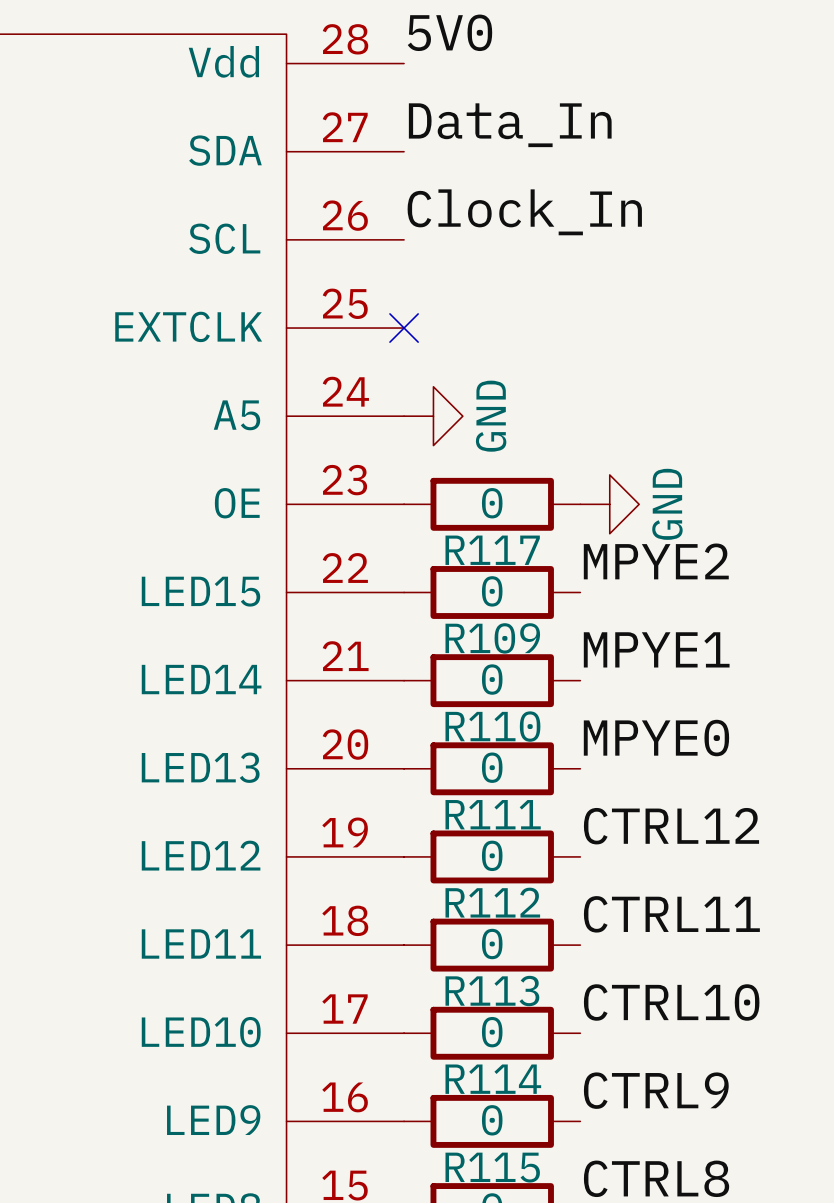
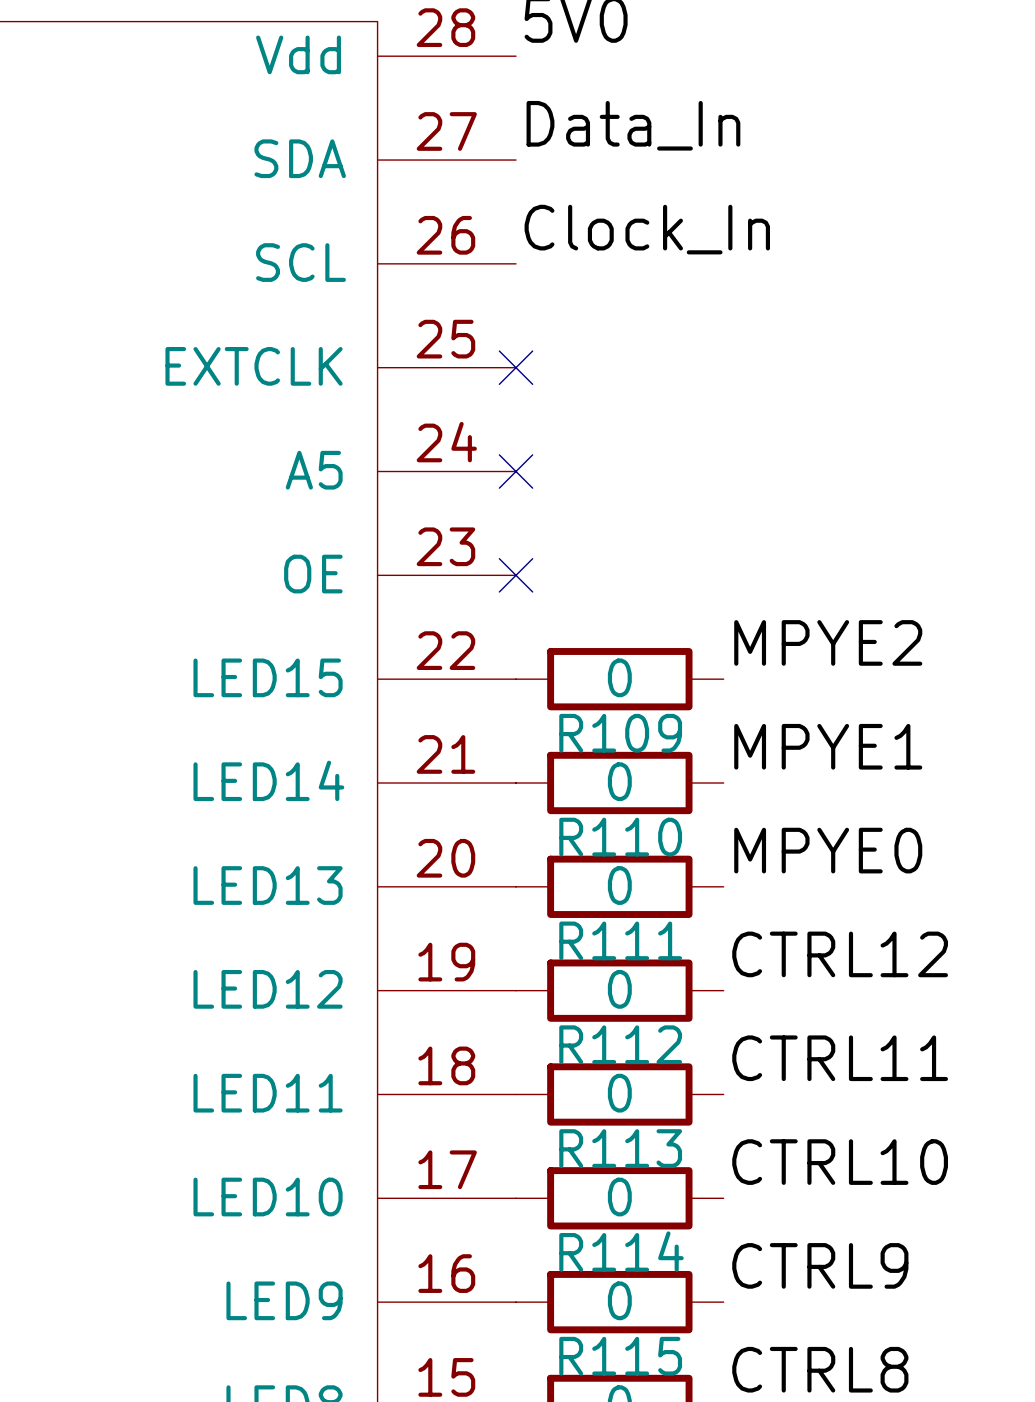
no-connect mark: none -> (516, 471)
power symbol: GND (433, 416) -> none
no-connect mark: none -> (516, 575)
R117: 0 (492, 504) -> none
power symbol: GND (609, 504) -> none

